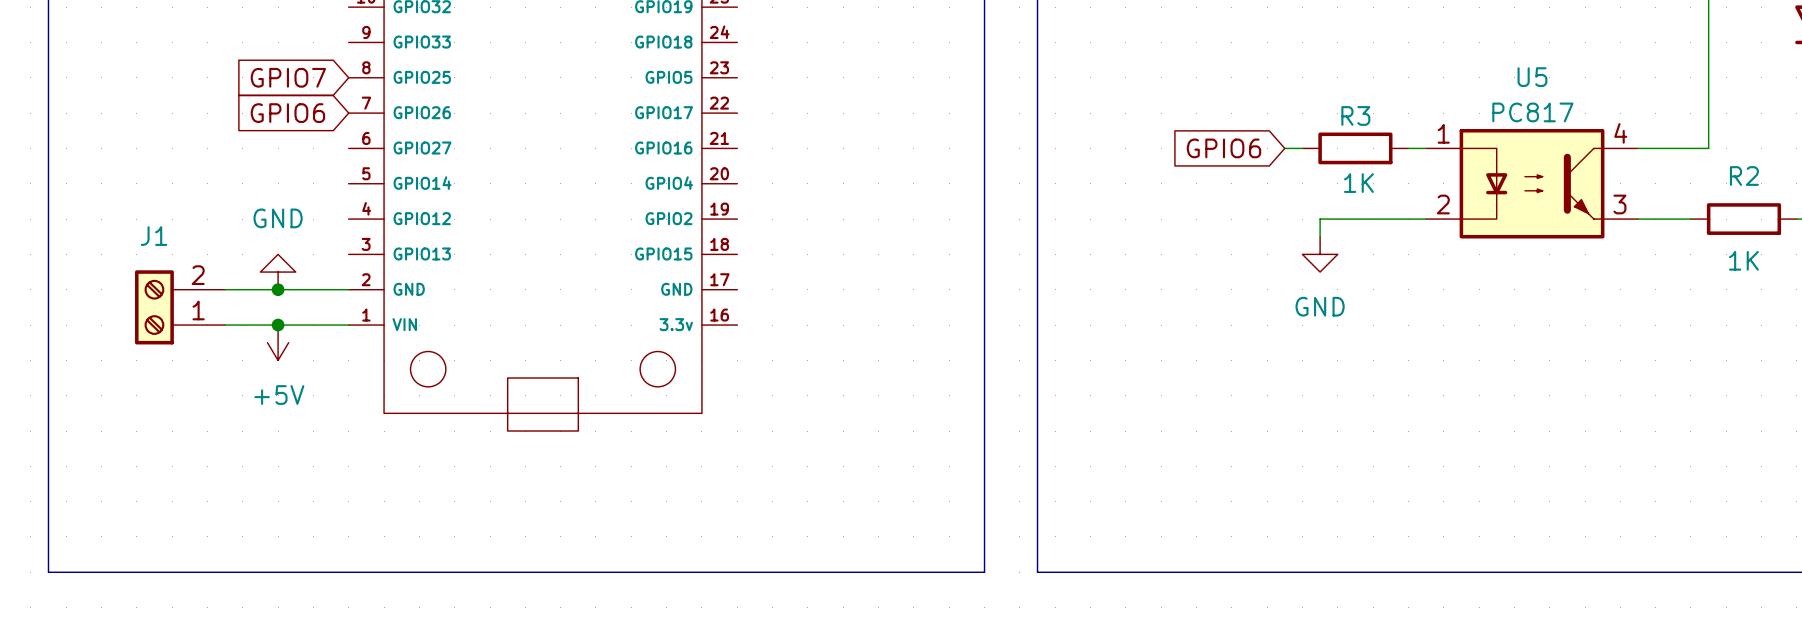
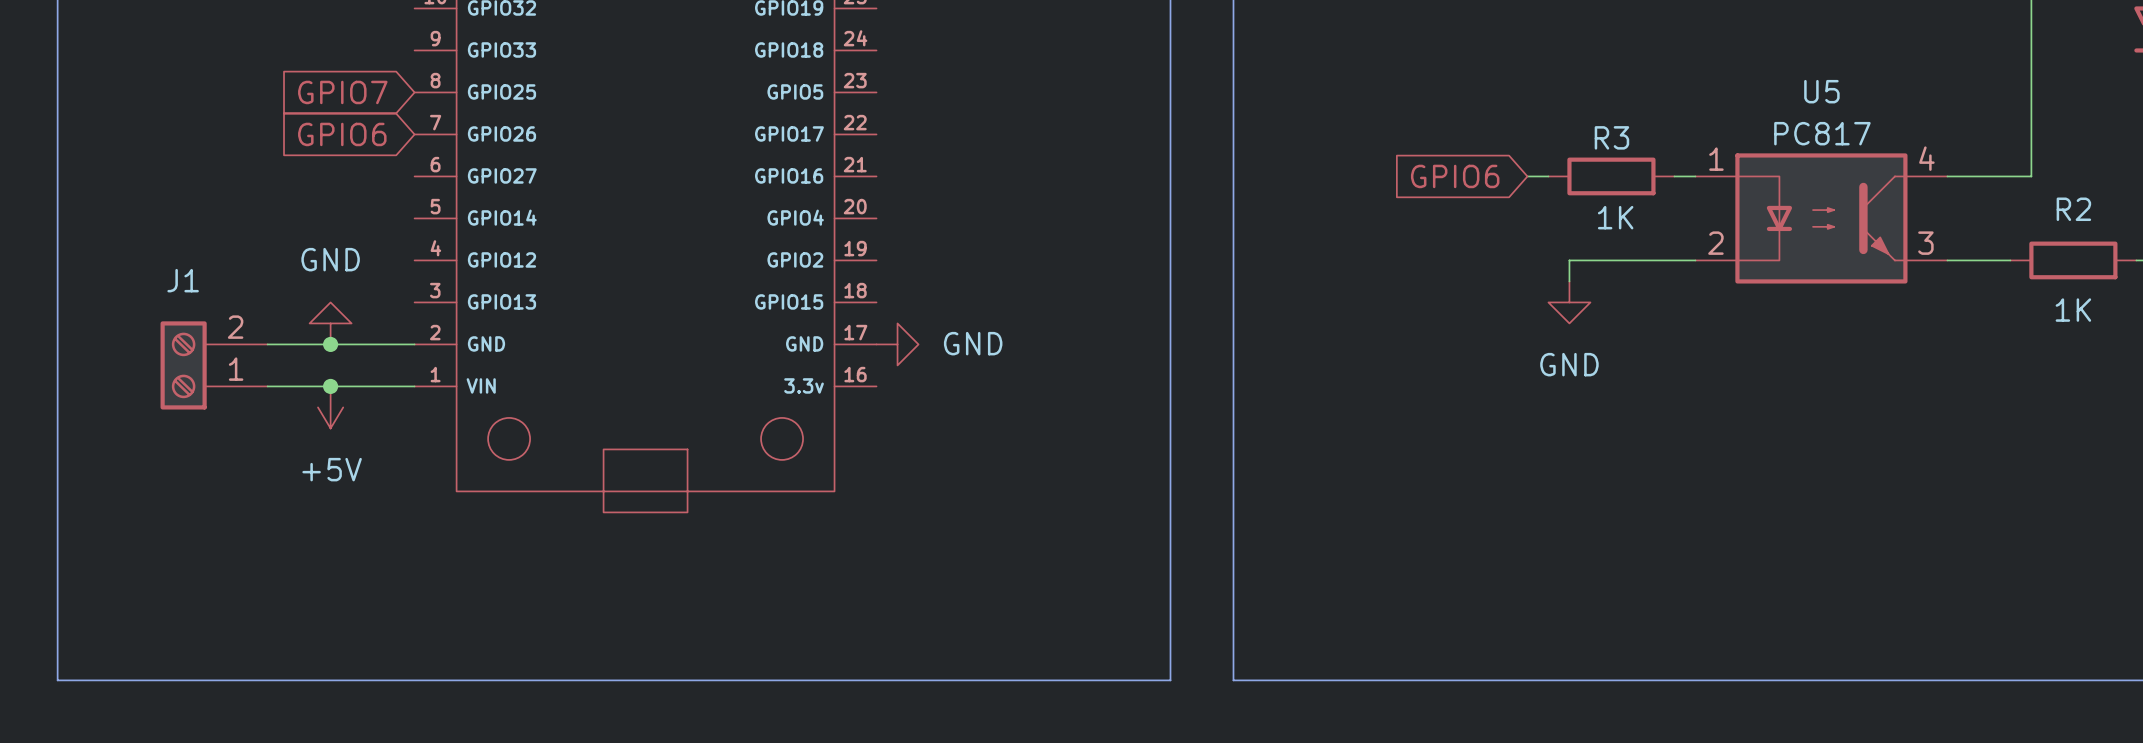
power symbol: none -> GND (897, 344)

